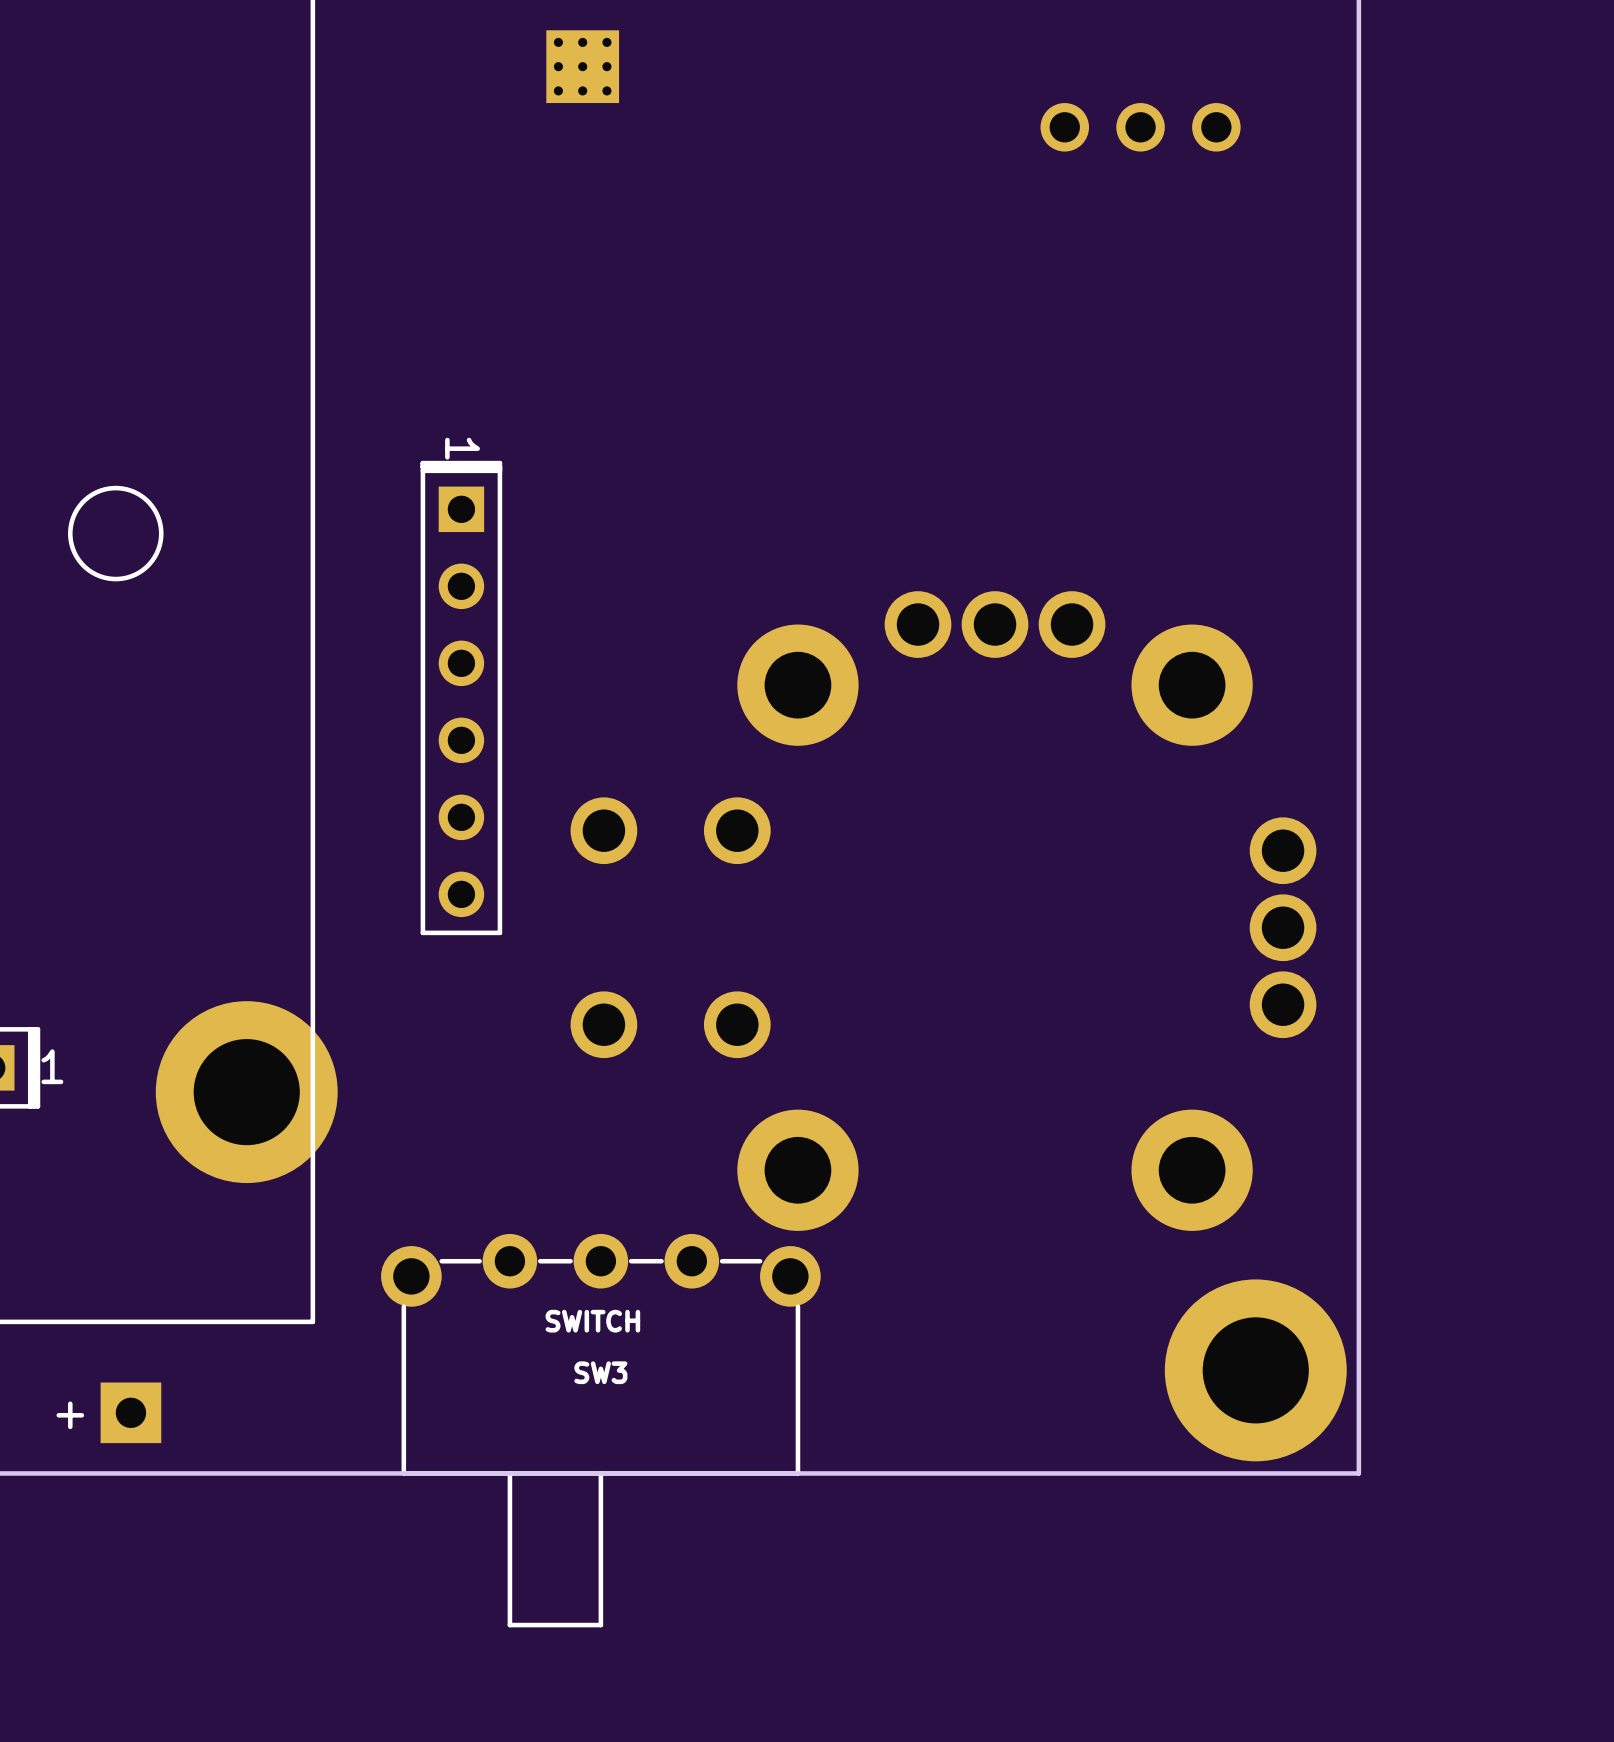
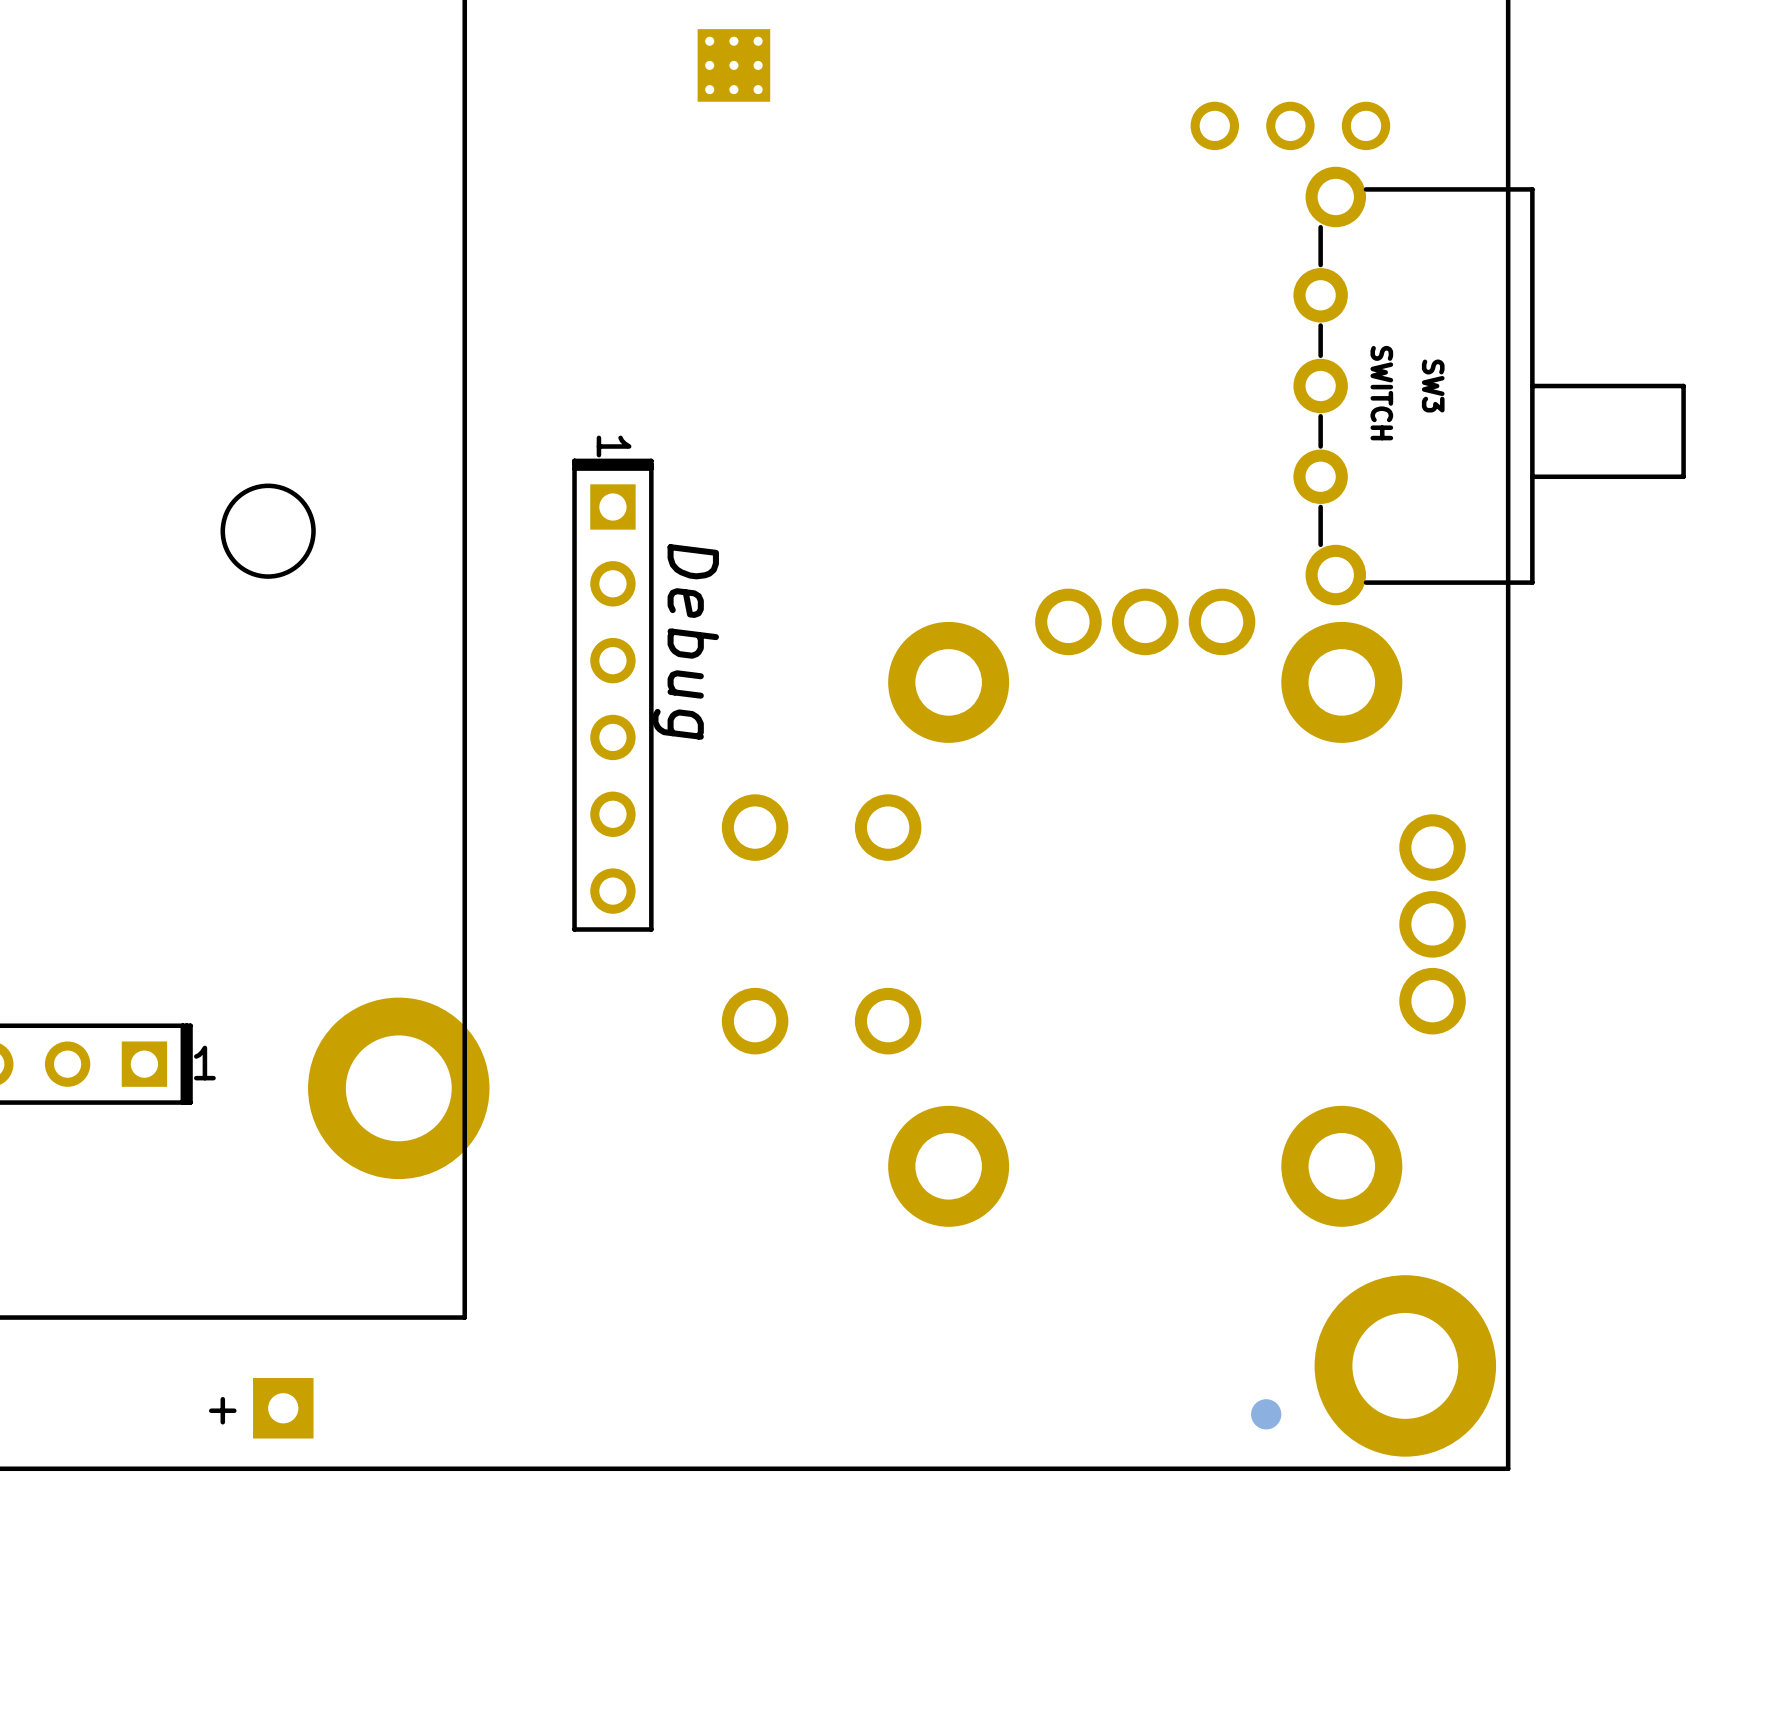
text: none -> Debug (685, 641)
part: none -> (1266, 1414)
SW3 rotation: 0° (600, 1430) -> 90° counterclockwise (1489, 386)
SW3 position: (600, 1430) -> (1489, 386)

